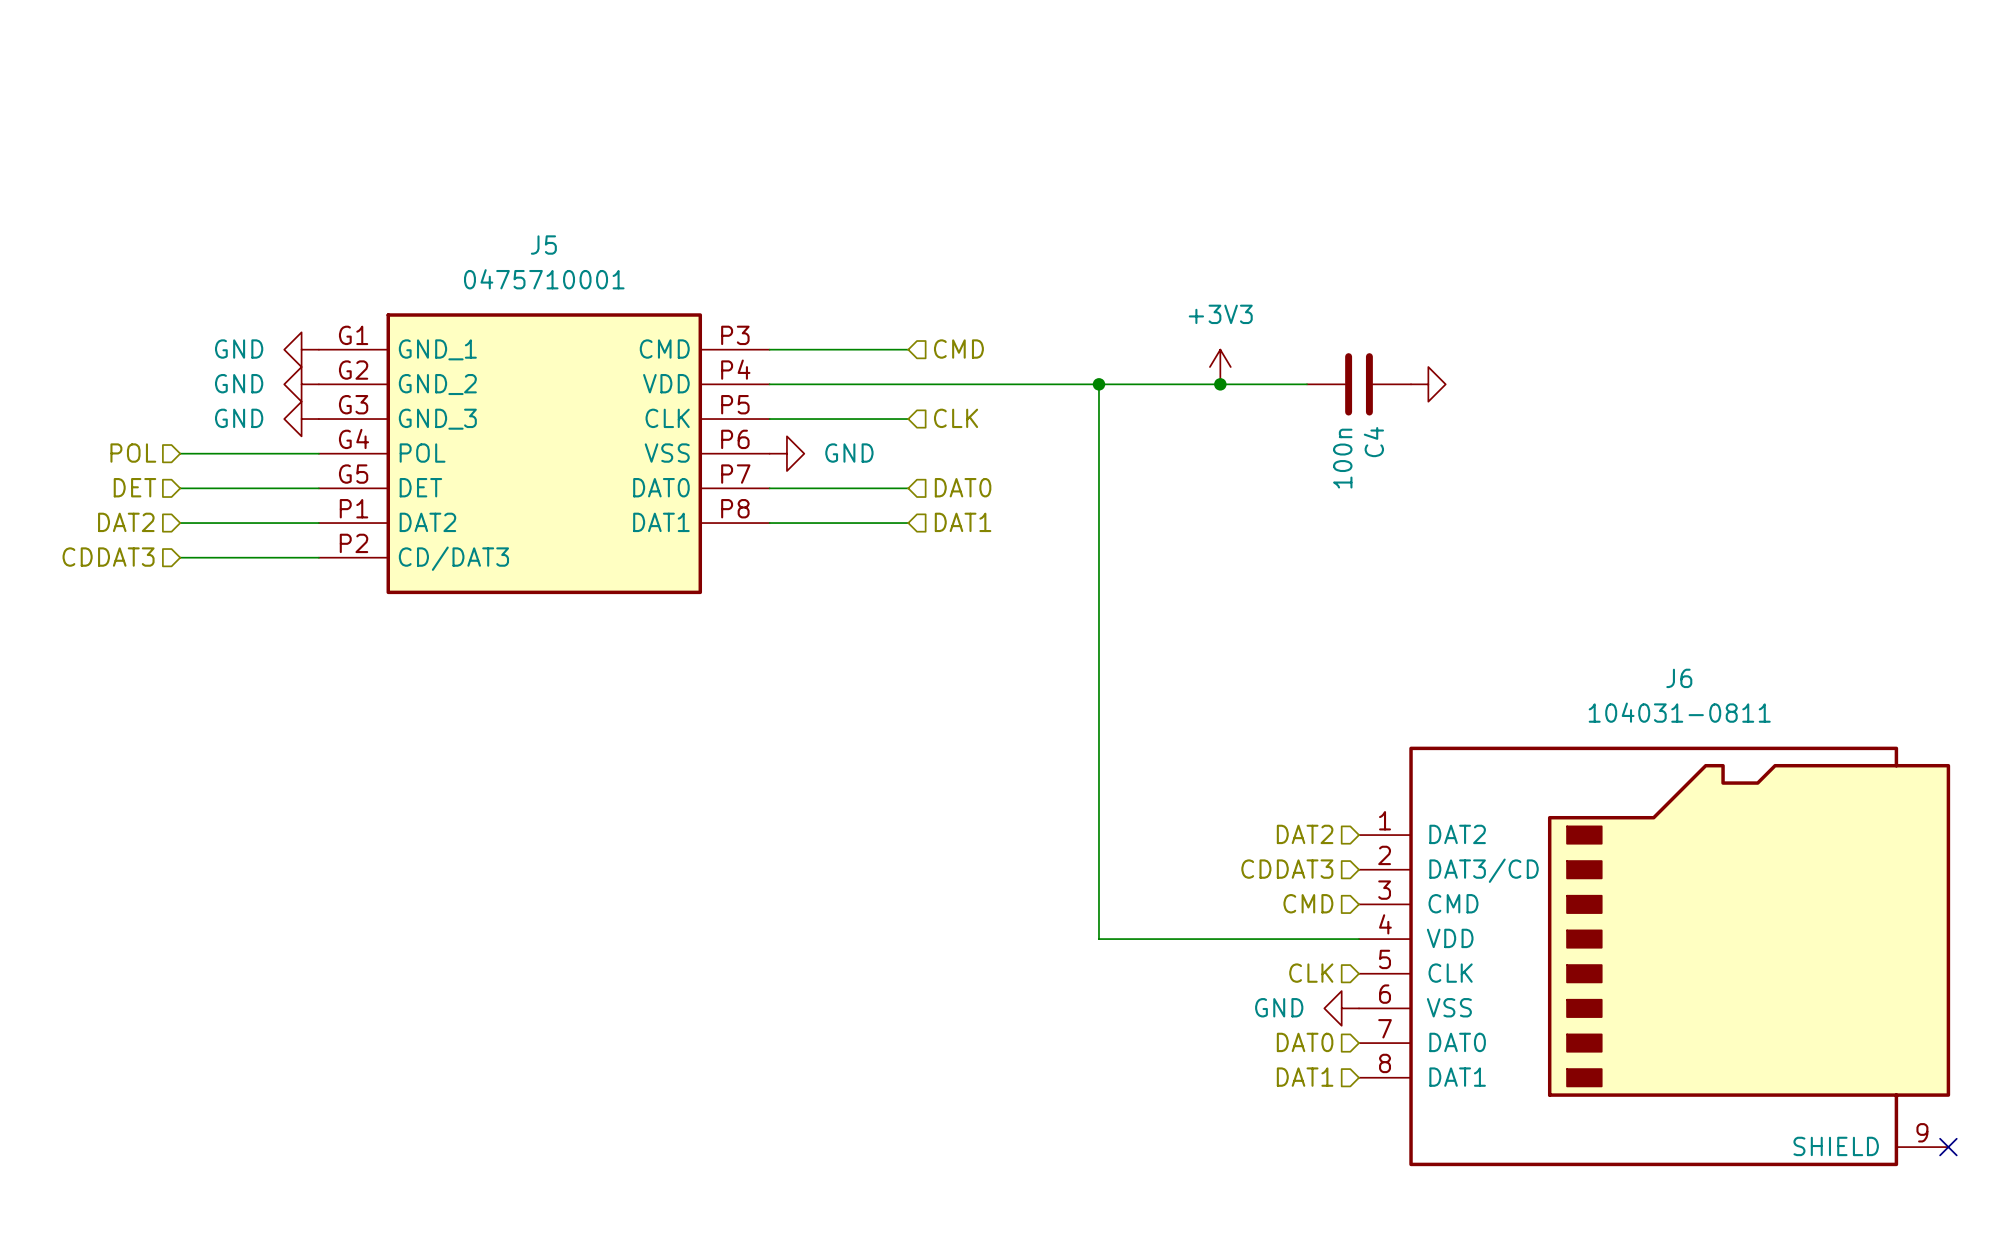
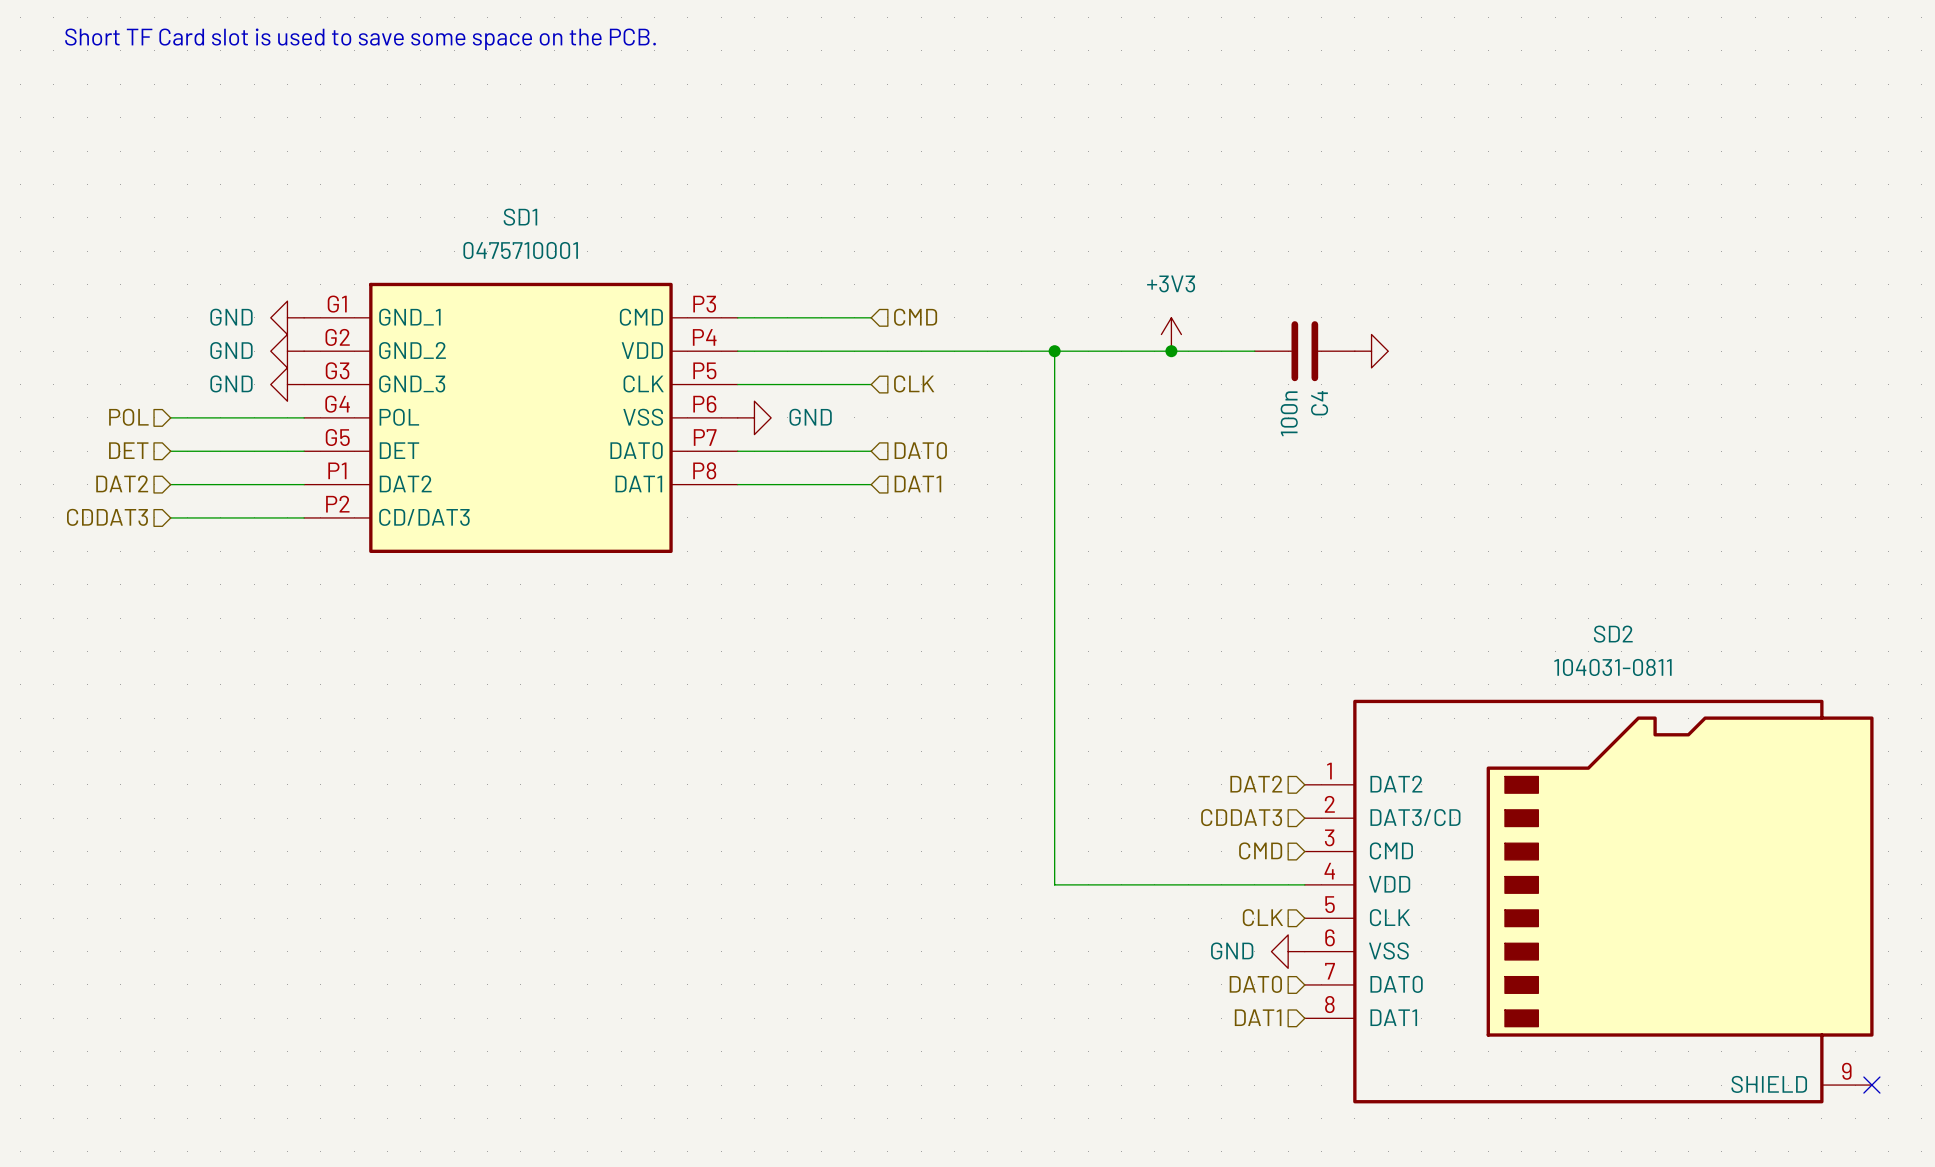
text: none -> Short TF Card slot is used to save some space on the PCB. (360, 39)
J5 name: J5 (543, 245) -> SD1 (520, 217)
J6 name: J6 (1679, 678) -> SD2 (1613, 634)

